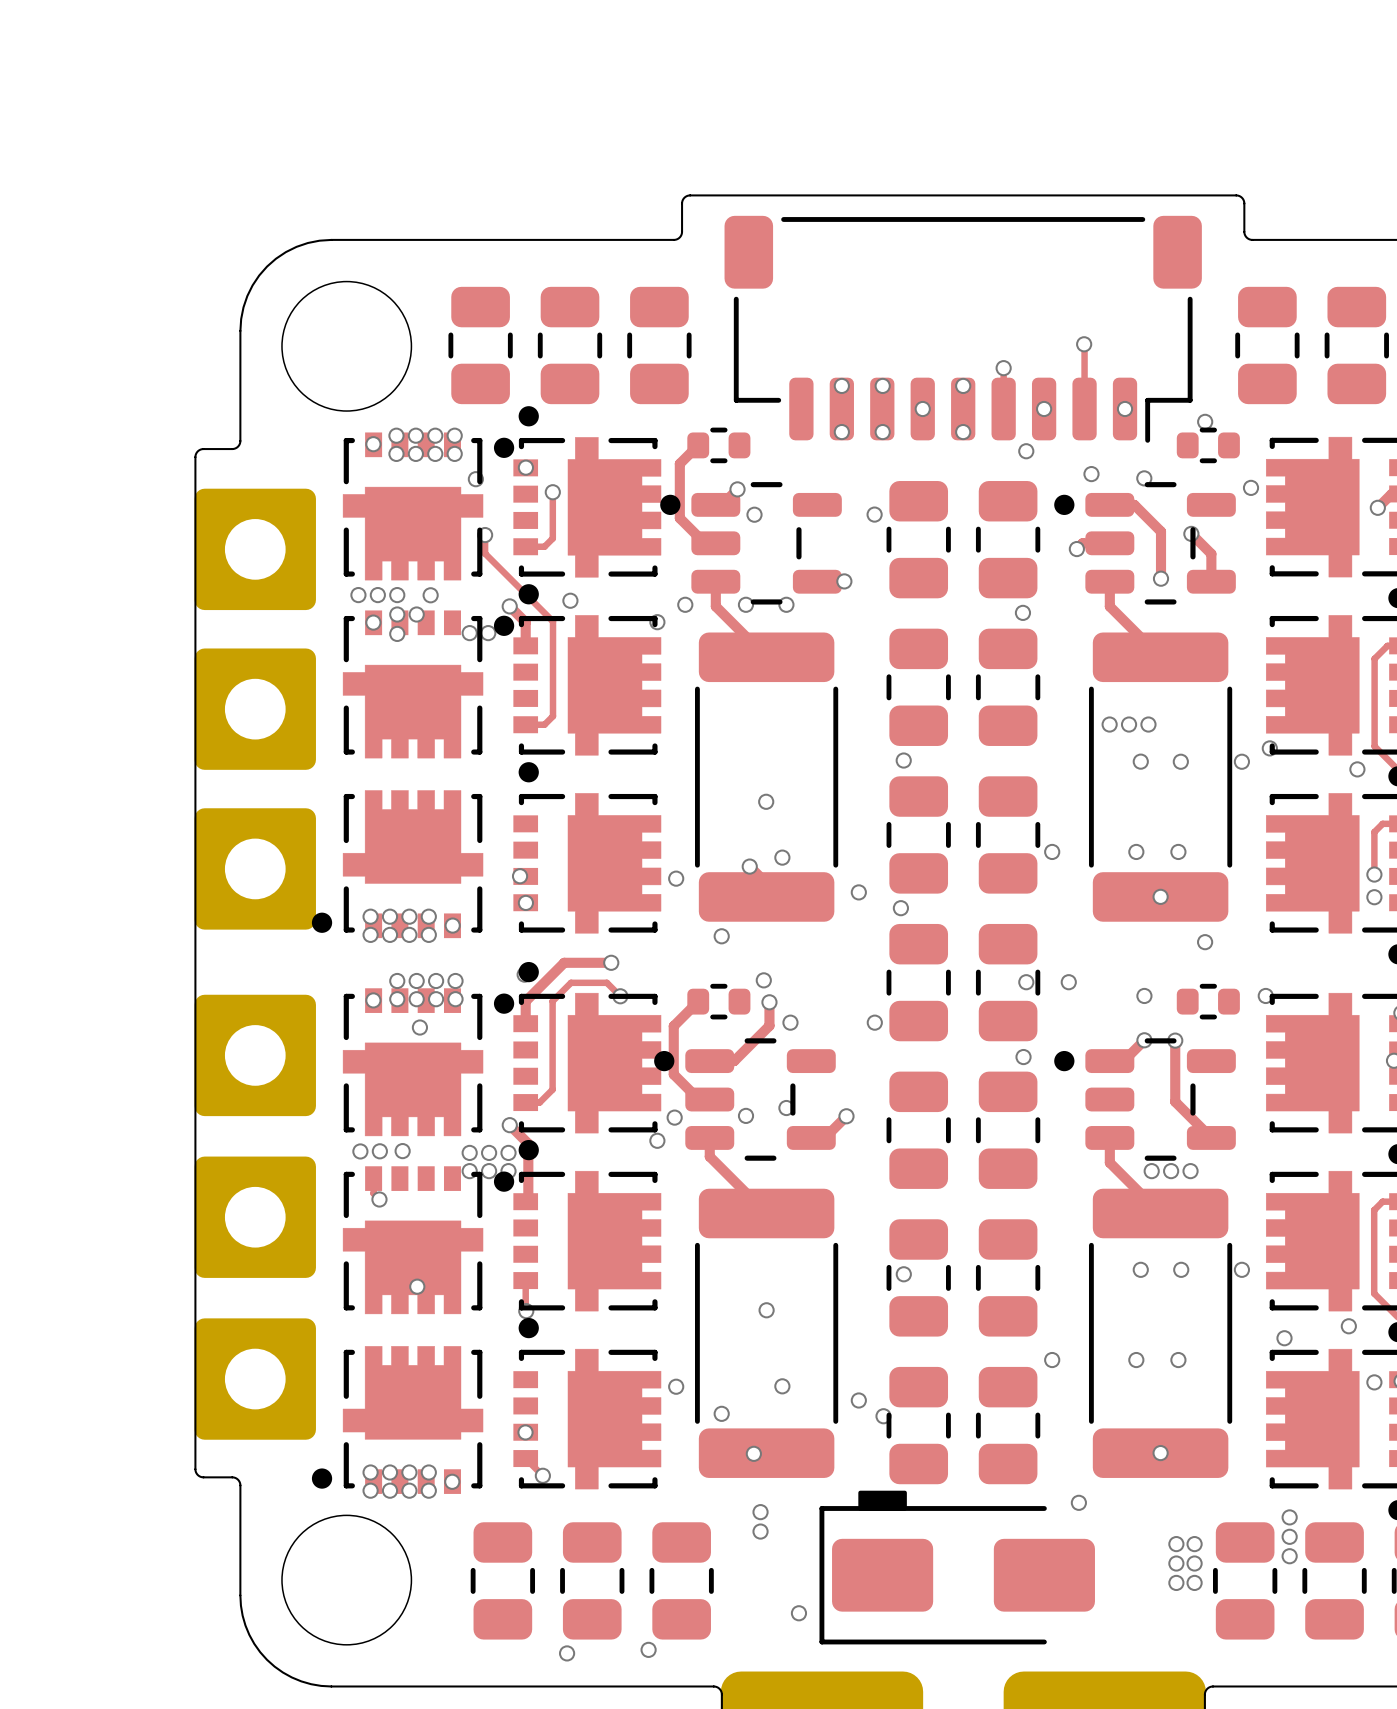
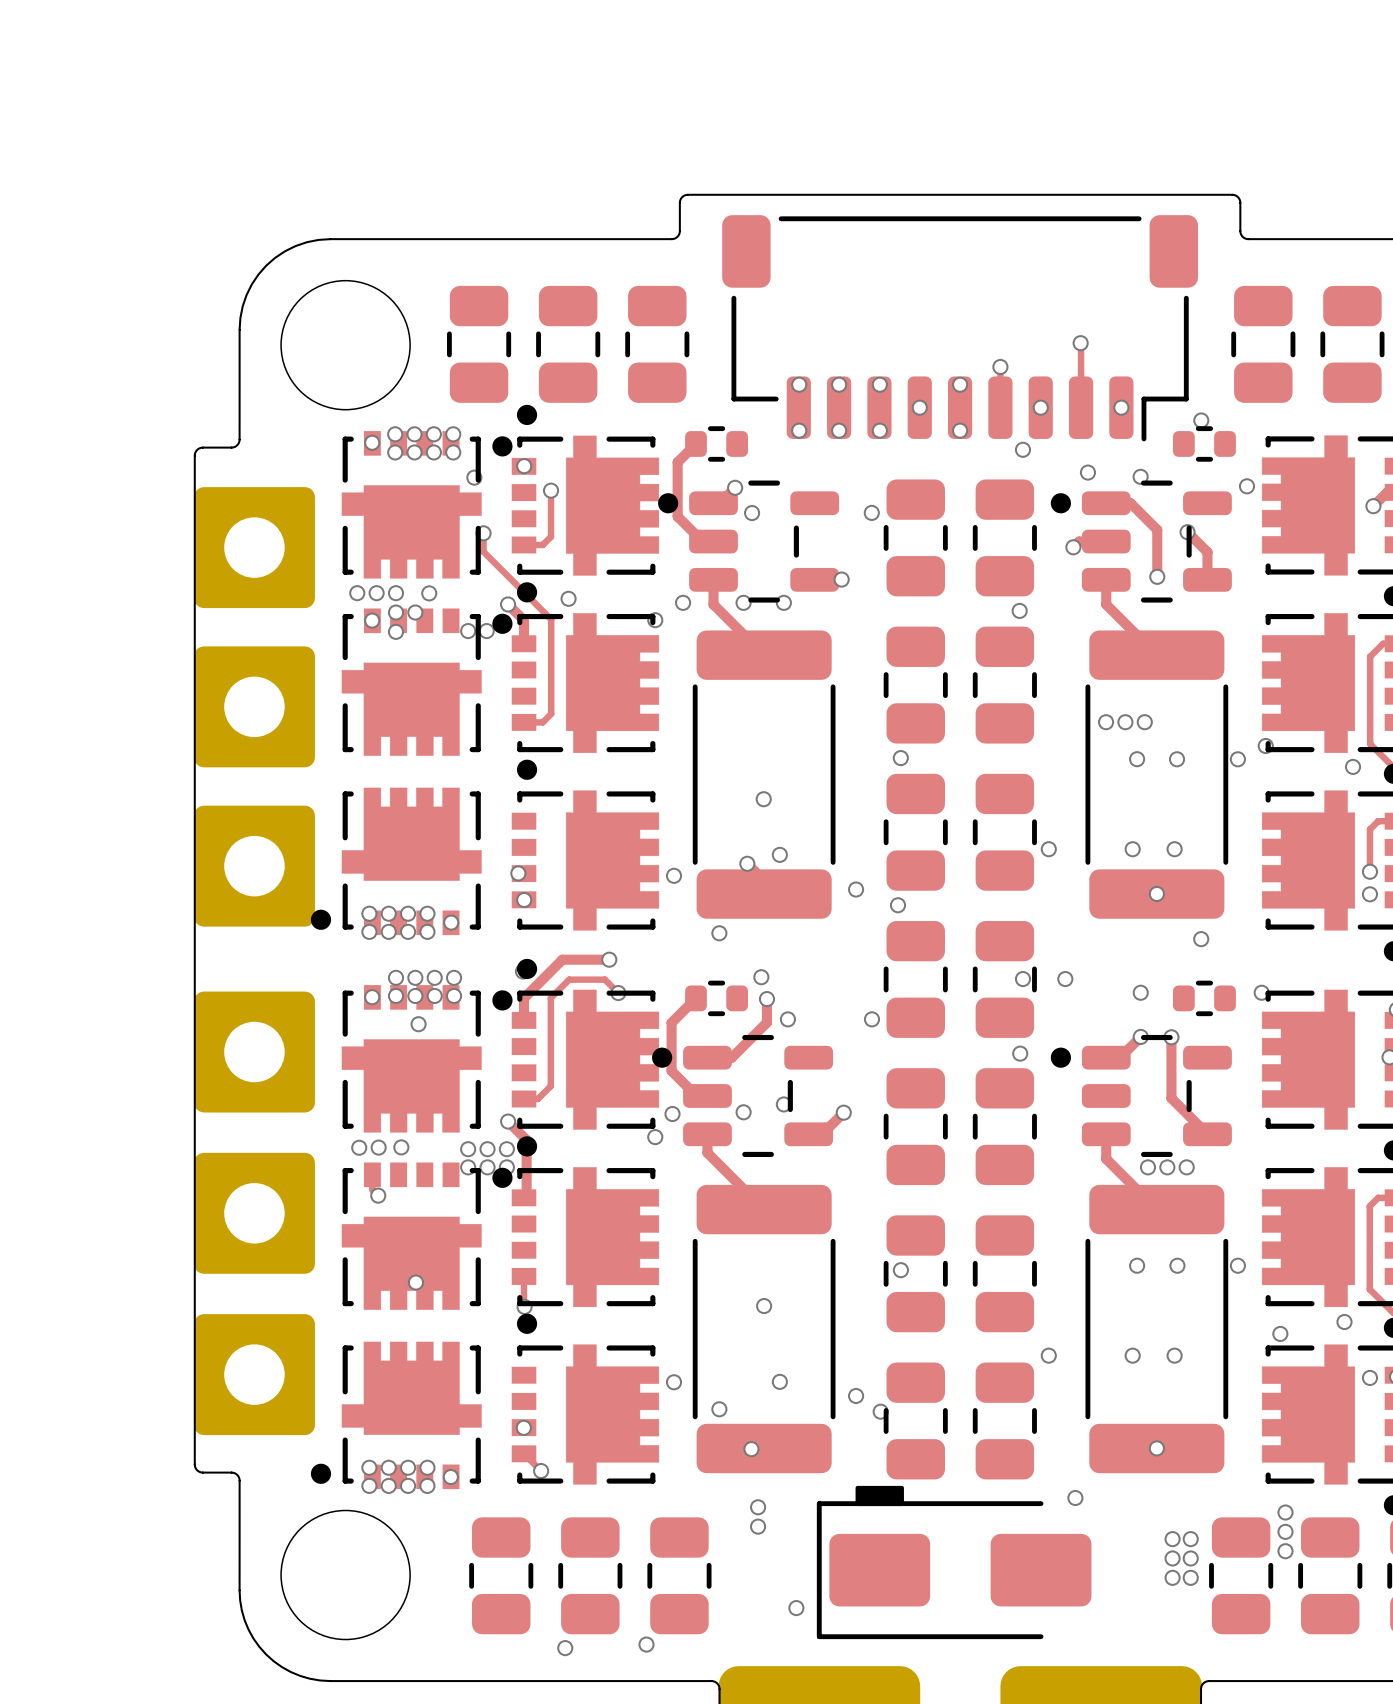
via: none -> (799, 384)
via: none -> (799, 430)

